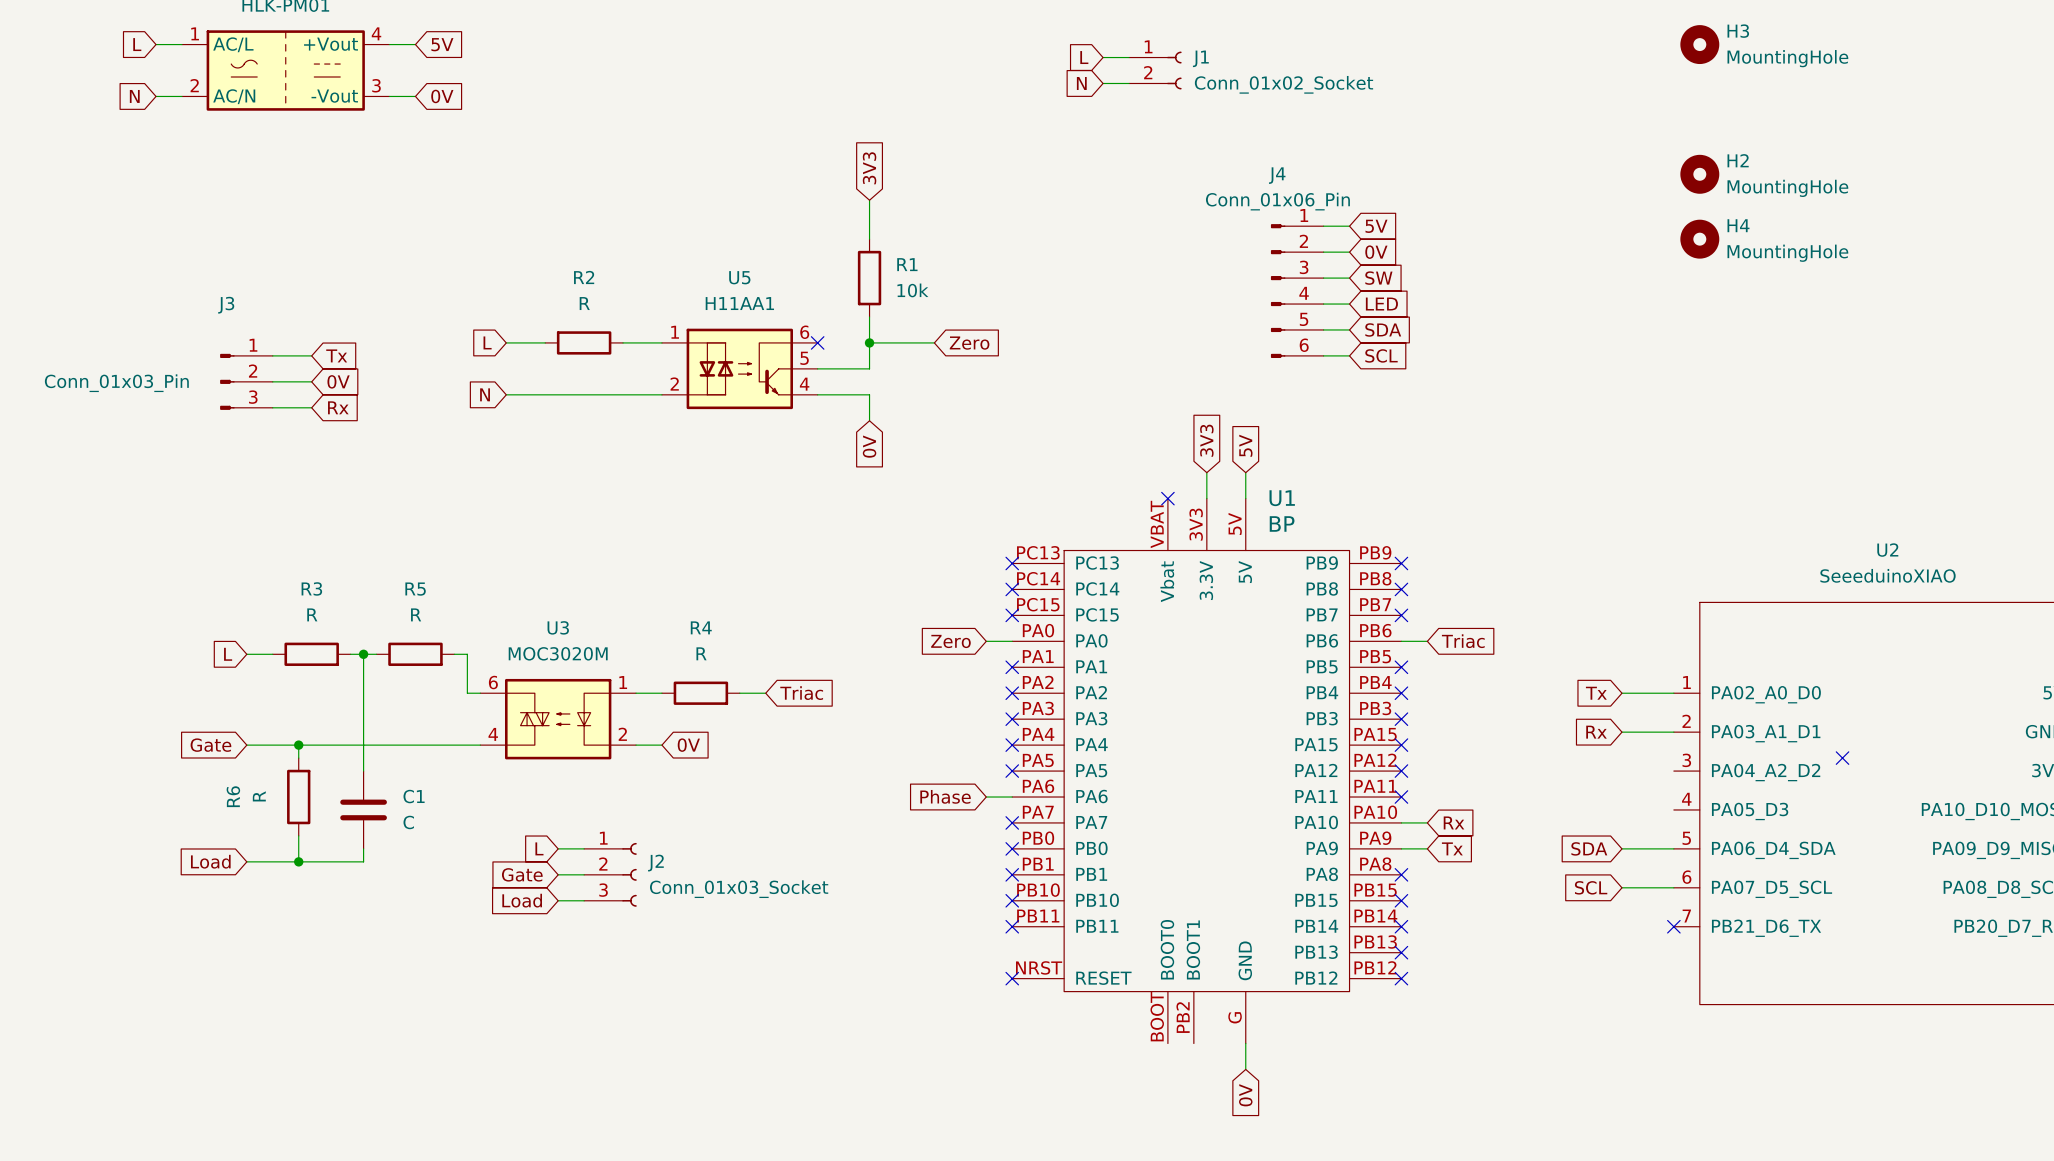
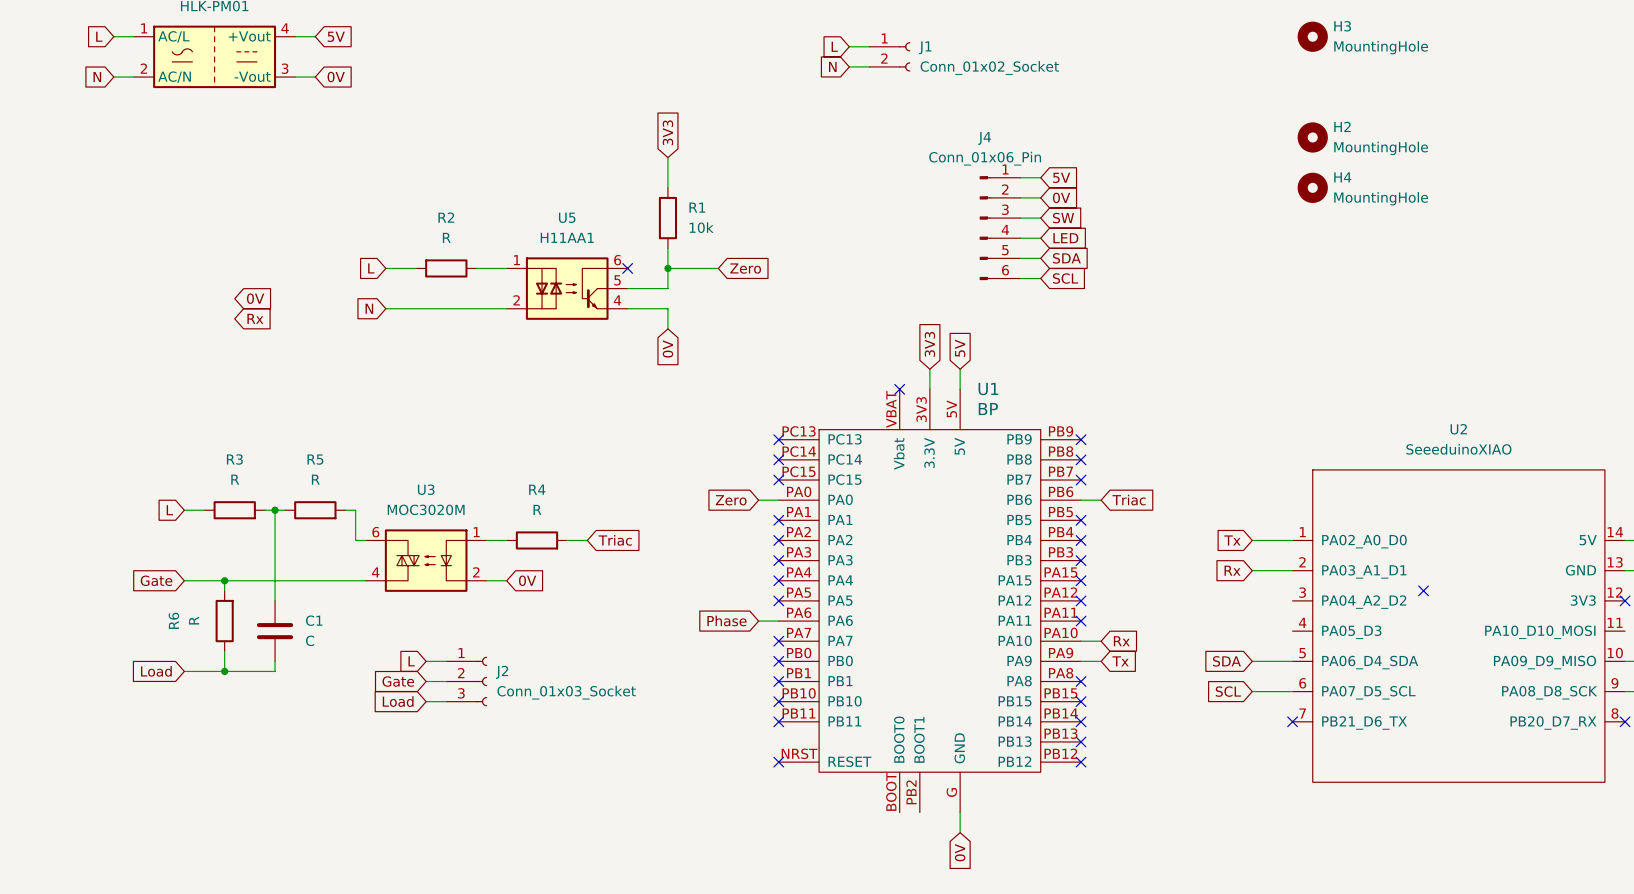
wire: (272, 355) (311, 355) -> none
global label: Tx (336, 355) -> none
J3: Conn_01x03_Pin (246, 381) -> none
wire: (272, 381) (311, 381) -> none
wire: (272, 407) (311, 407) -> none

